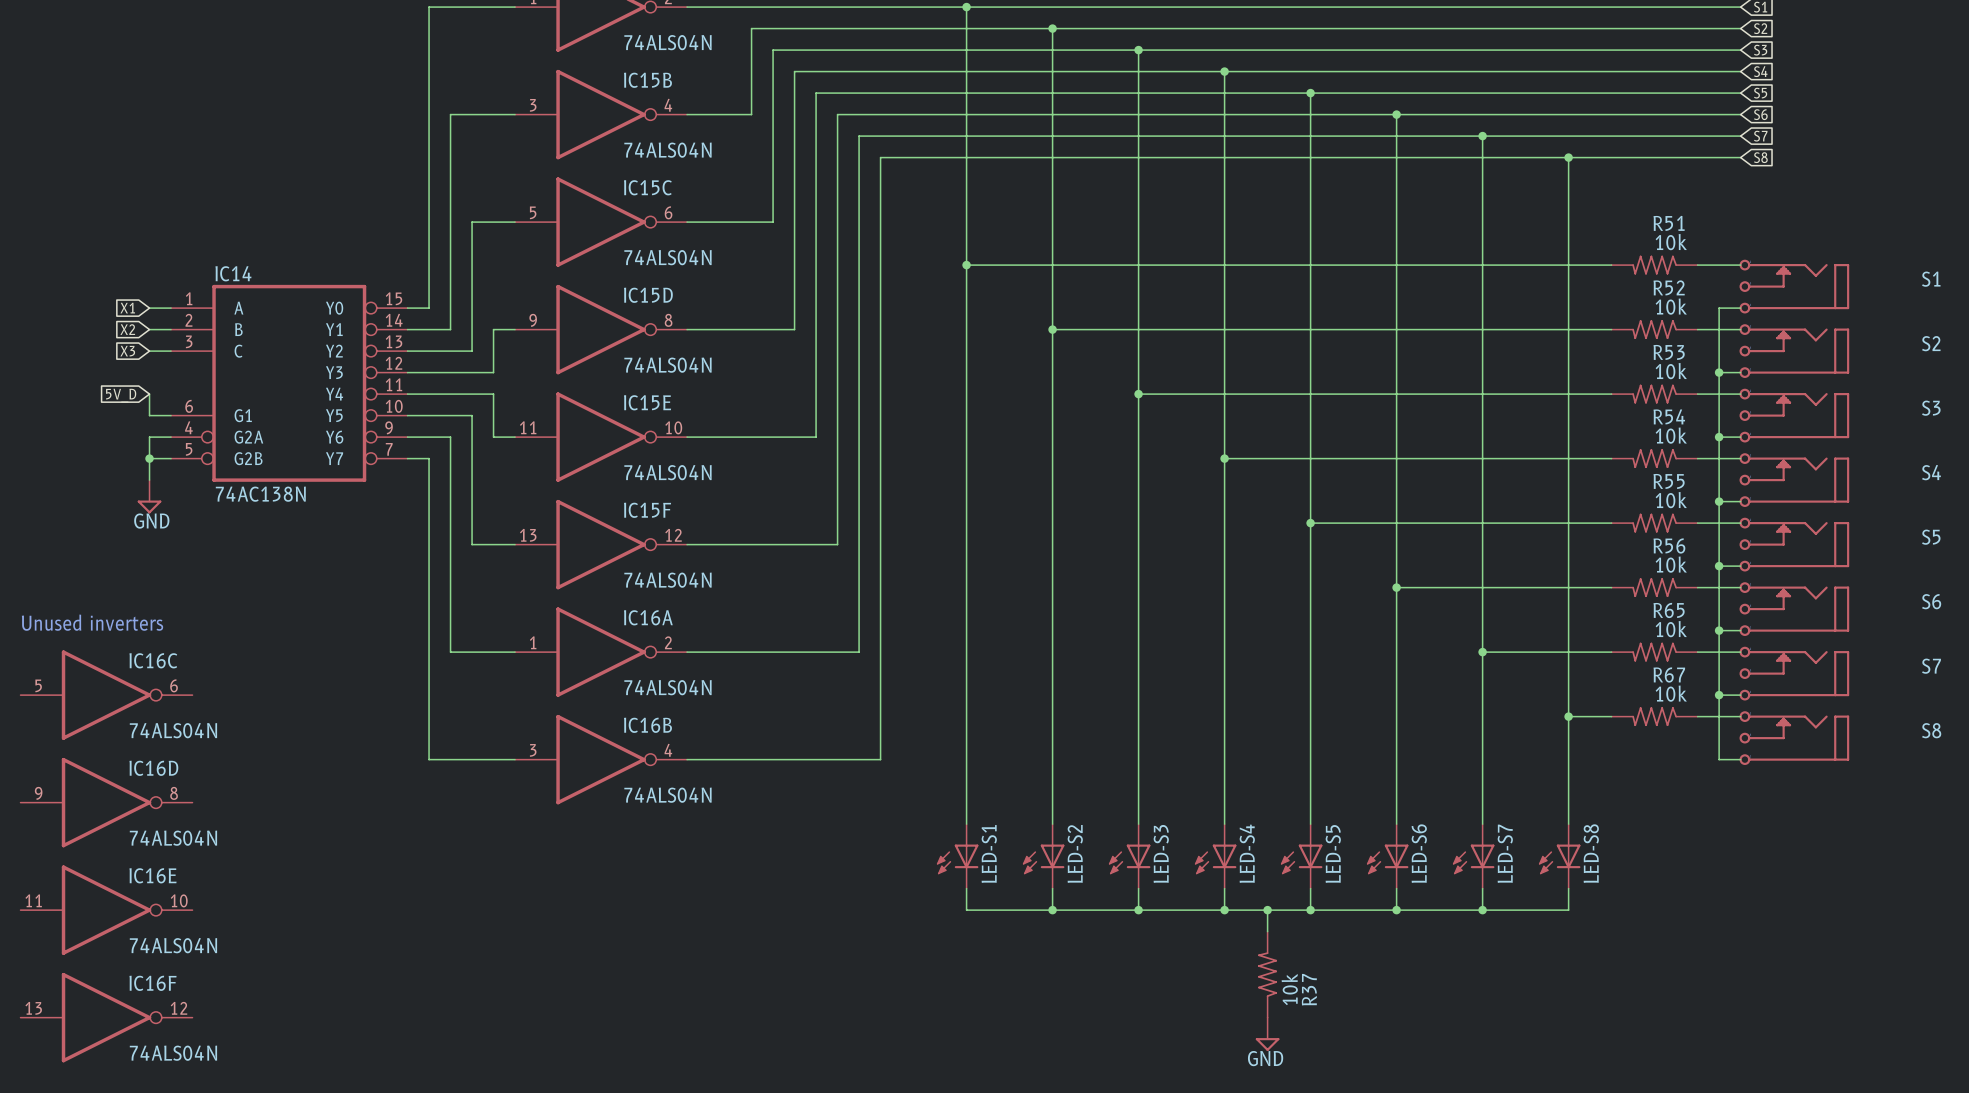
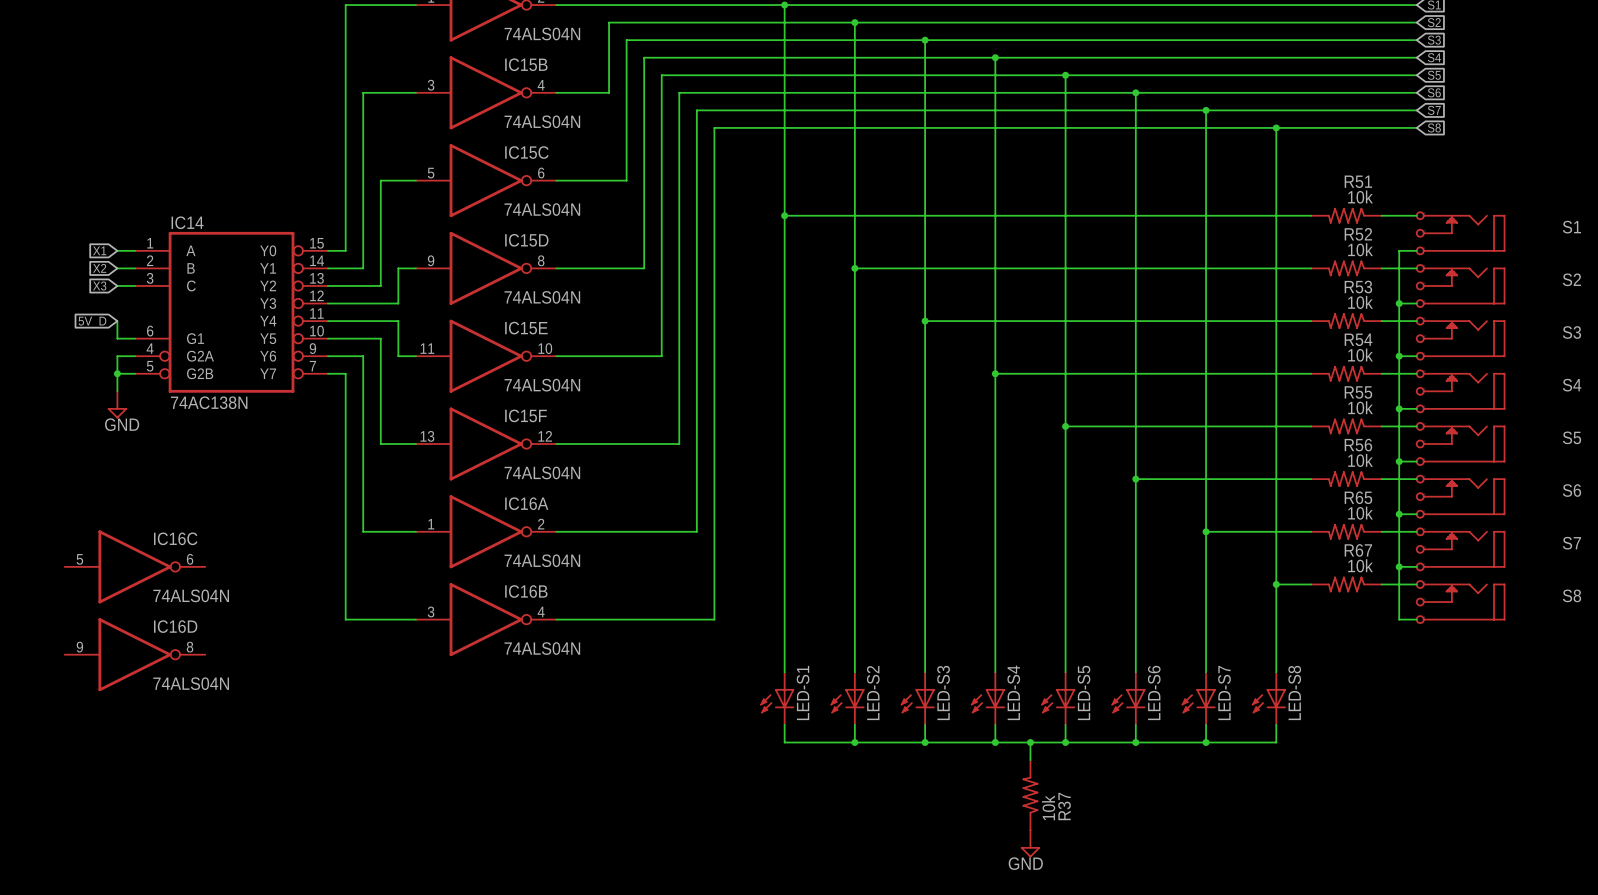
text: Unused inverters (92, 622) -> none
IC16C position: (106, 695) -> (134, 566)
IC16D position: (106, 802) -> (134, 654)
IC16E: 74ALS04N (106, 910) -> none
IC16F: 74ALS04N (106, 1017) -> none

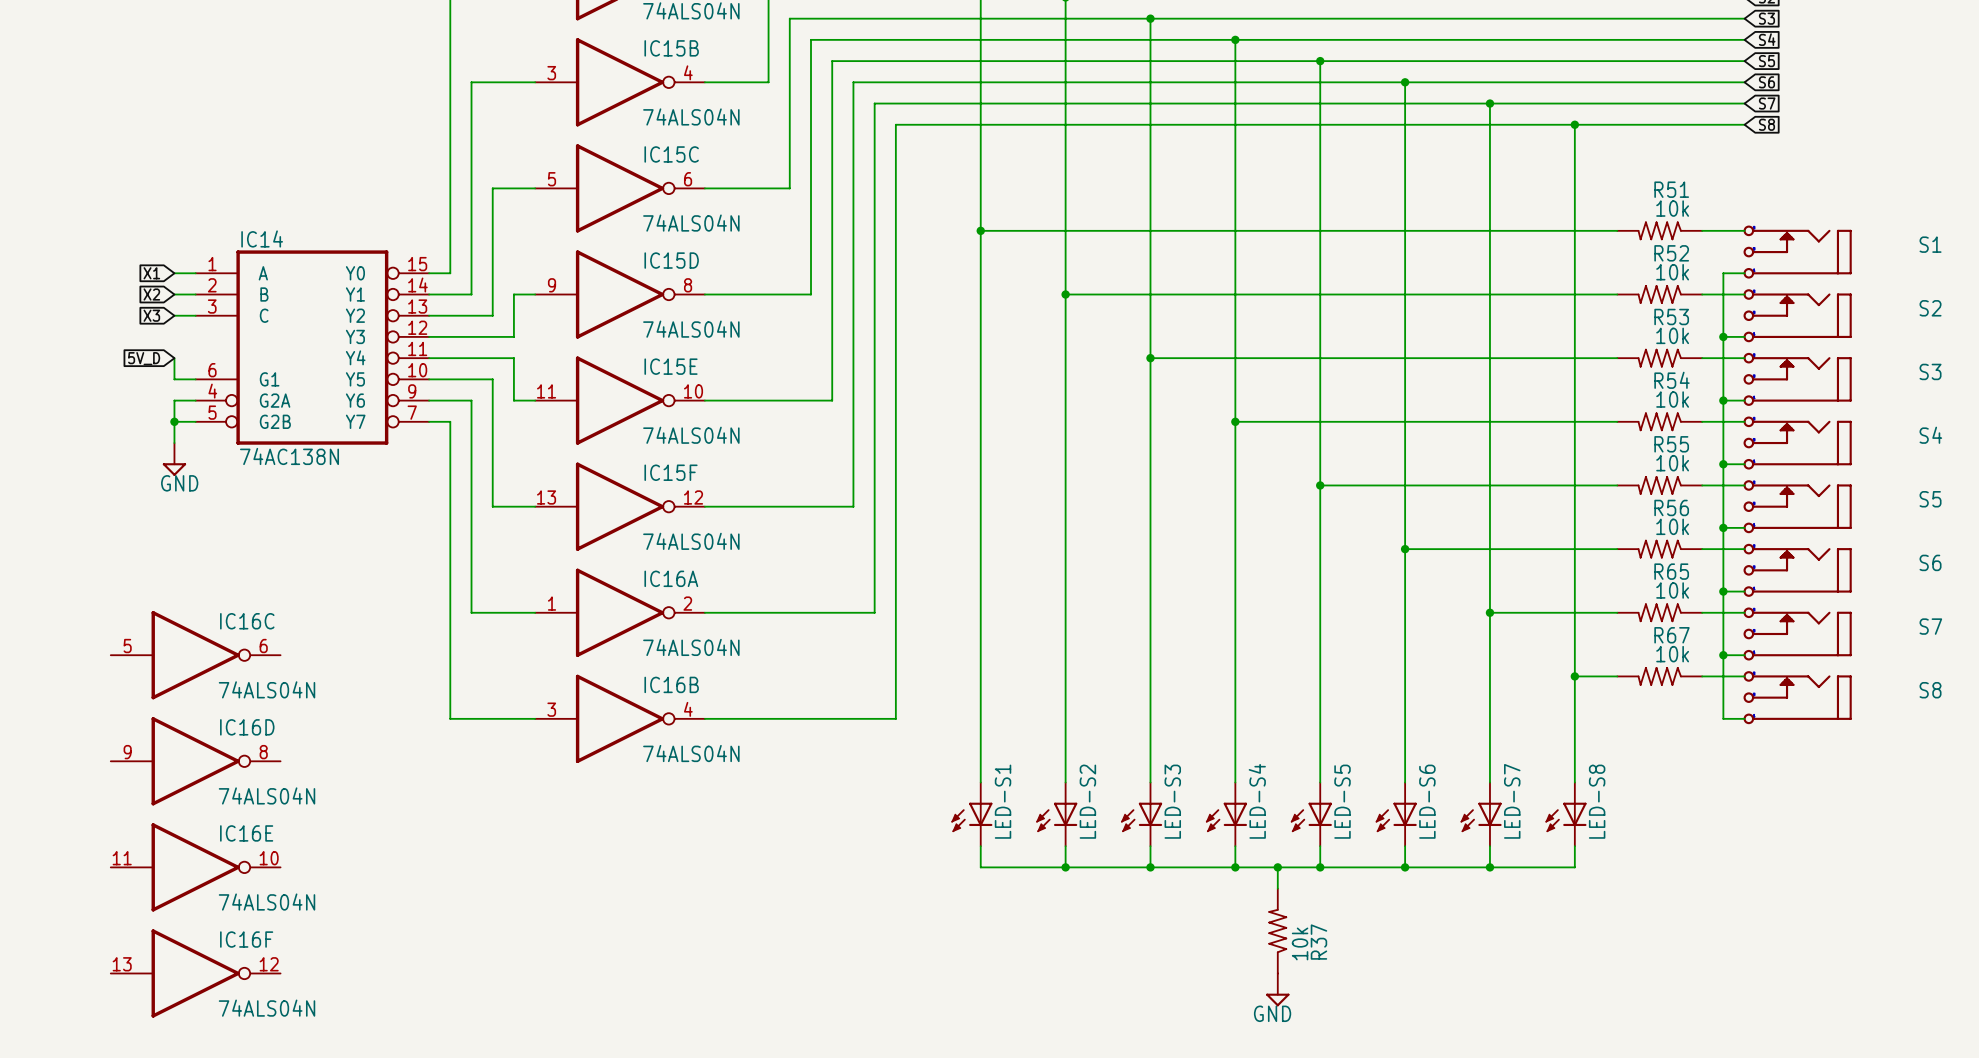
IC16E: none -> 74ALS04N (195, 867)
IC16F: none -> 74ALS04N (195, 973)

